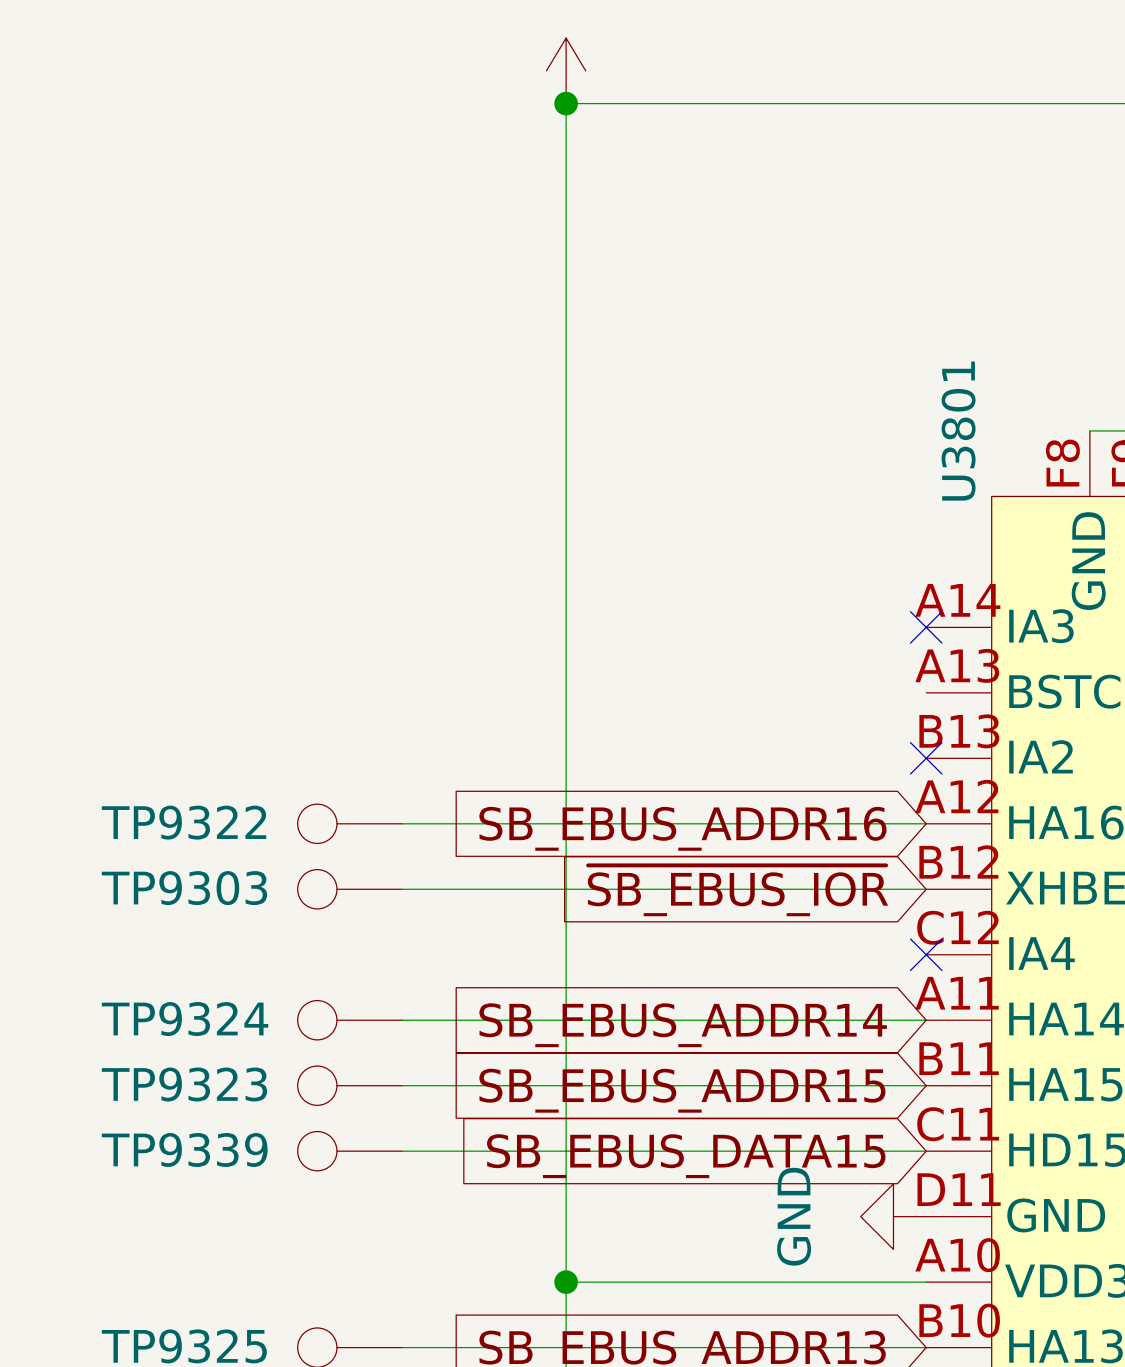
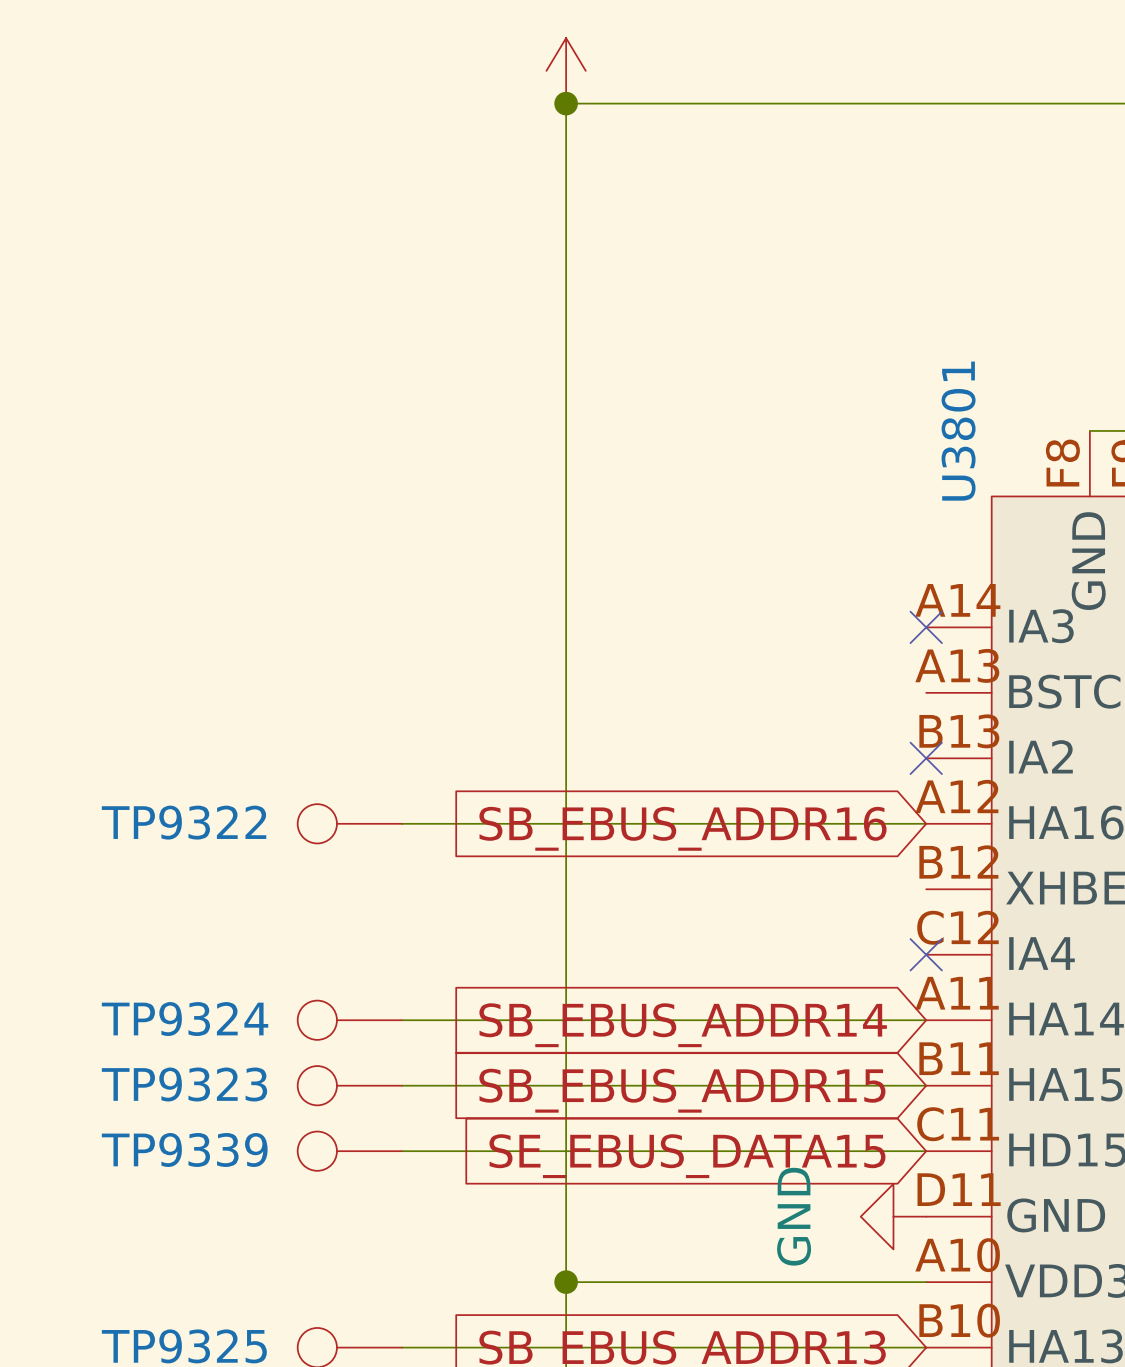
TP9303: (350, 889) -> none
wire: (402, 889) (926, 889) -> none
global label: ~{SB_EBUS_IOR} (737, 890) -> none
global label: SB_EBUS_DATA15 (686, 1156) -> SE_EBUS_DATA15 (687, 1156)

